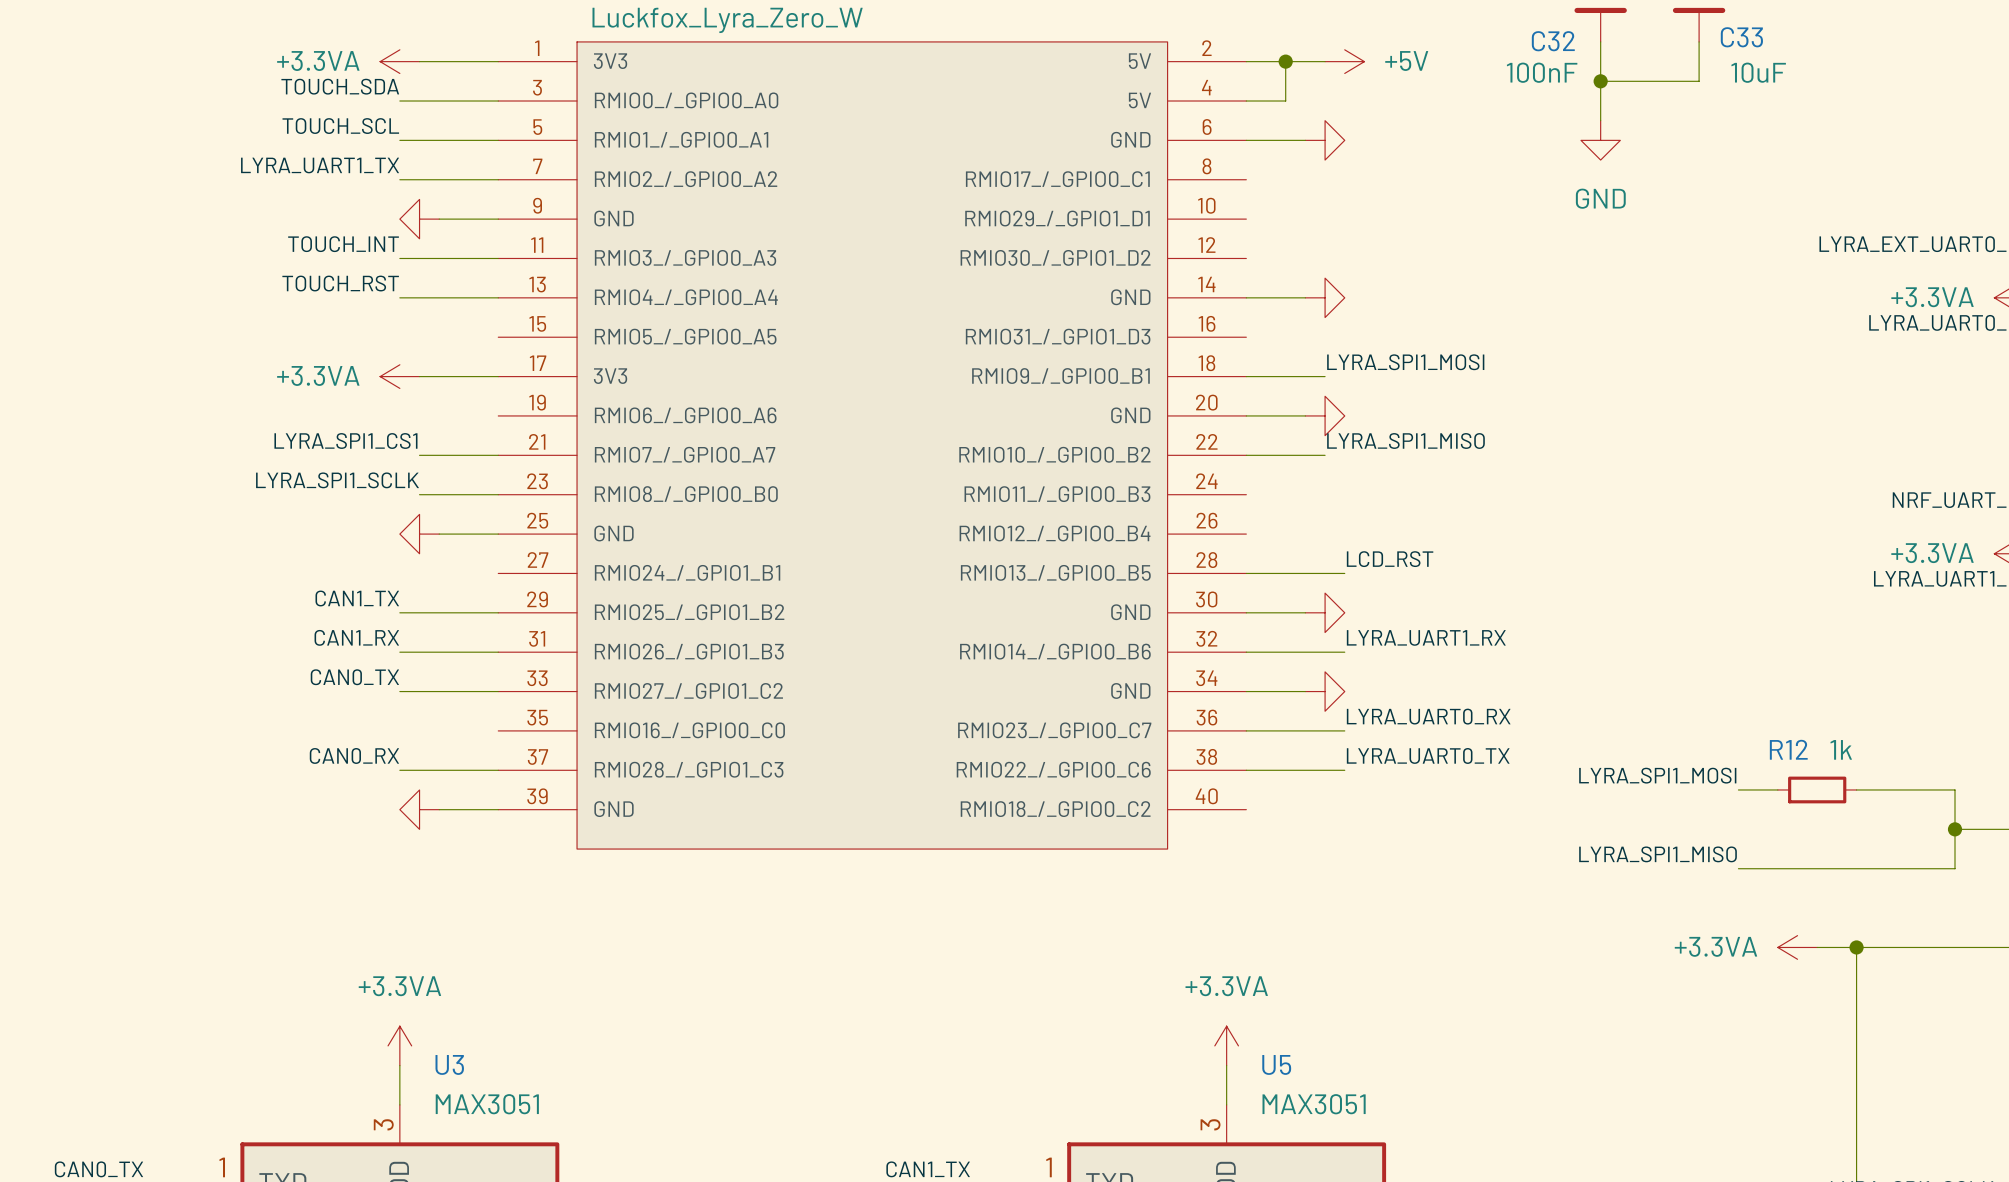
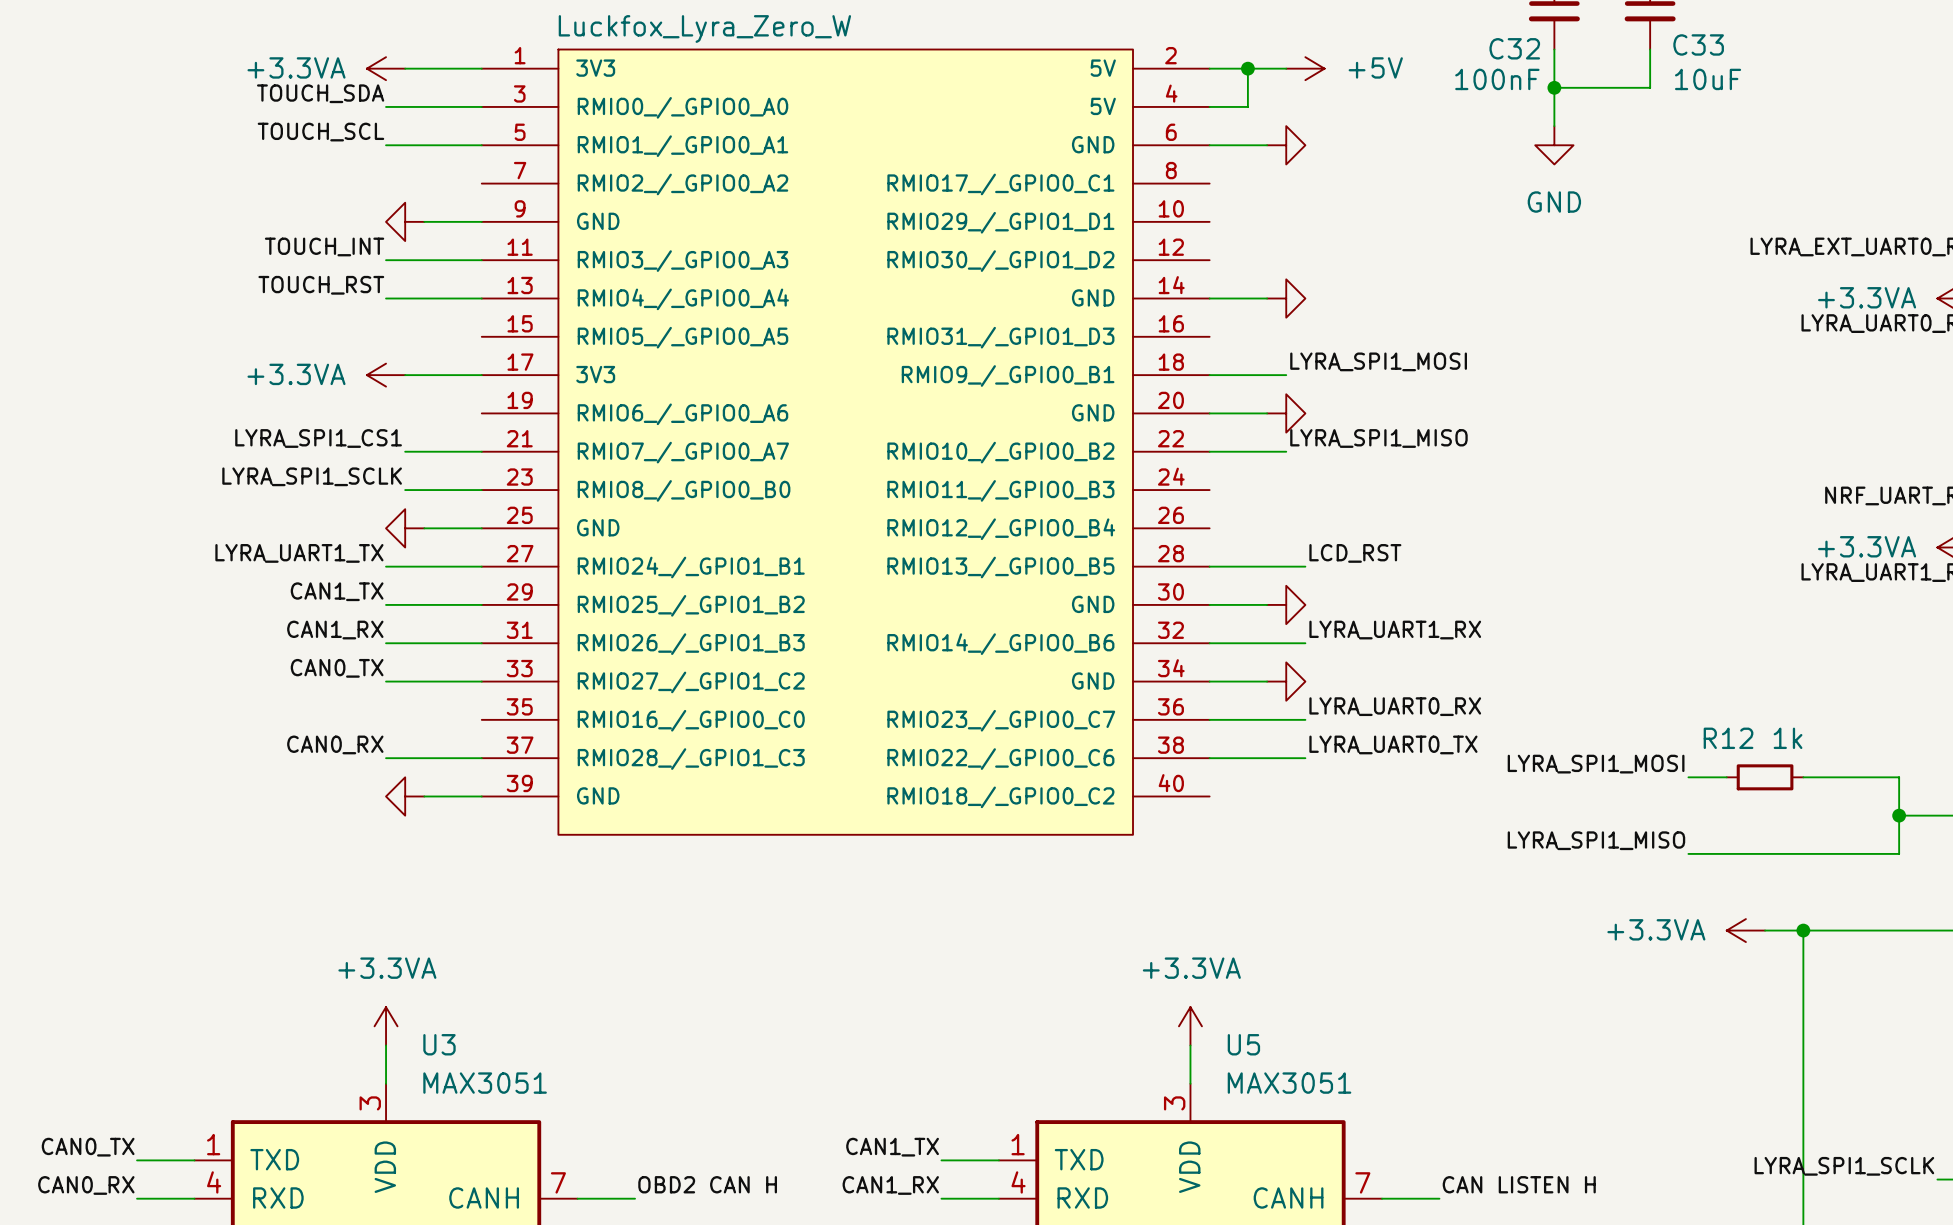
label: LYRA_UART1_TX (320, 165) -> none
wire: (399, 179) (498, 179) -> none
label: none -> LYRA_UART1_TX (299, 553)
wire: none -> (386, 566) (481, 566)

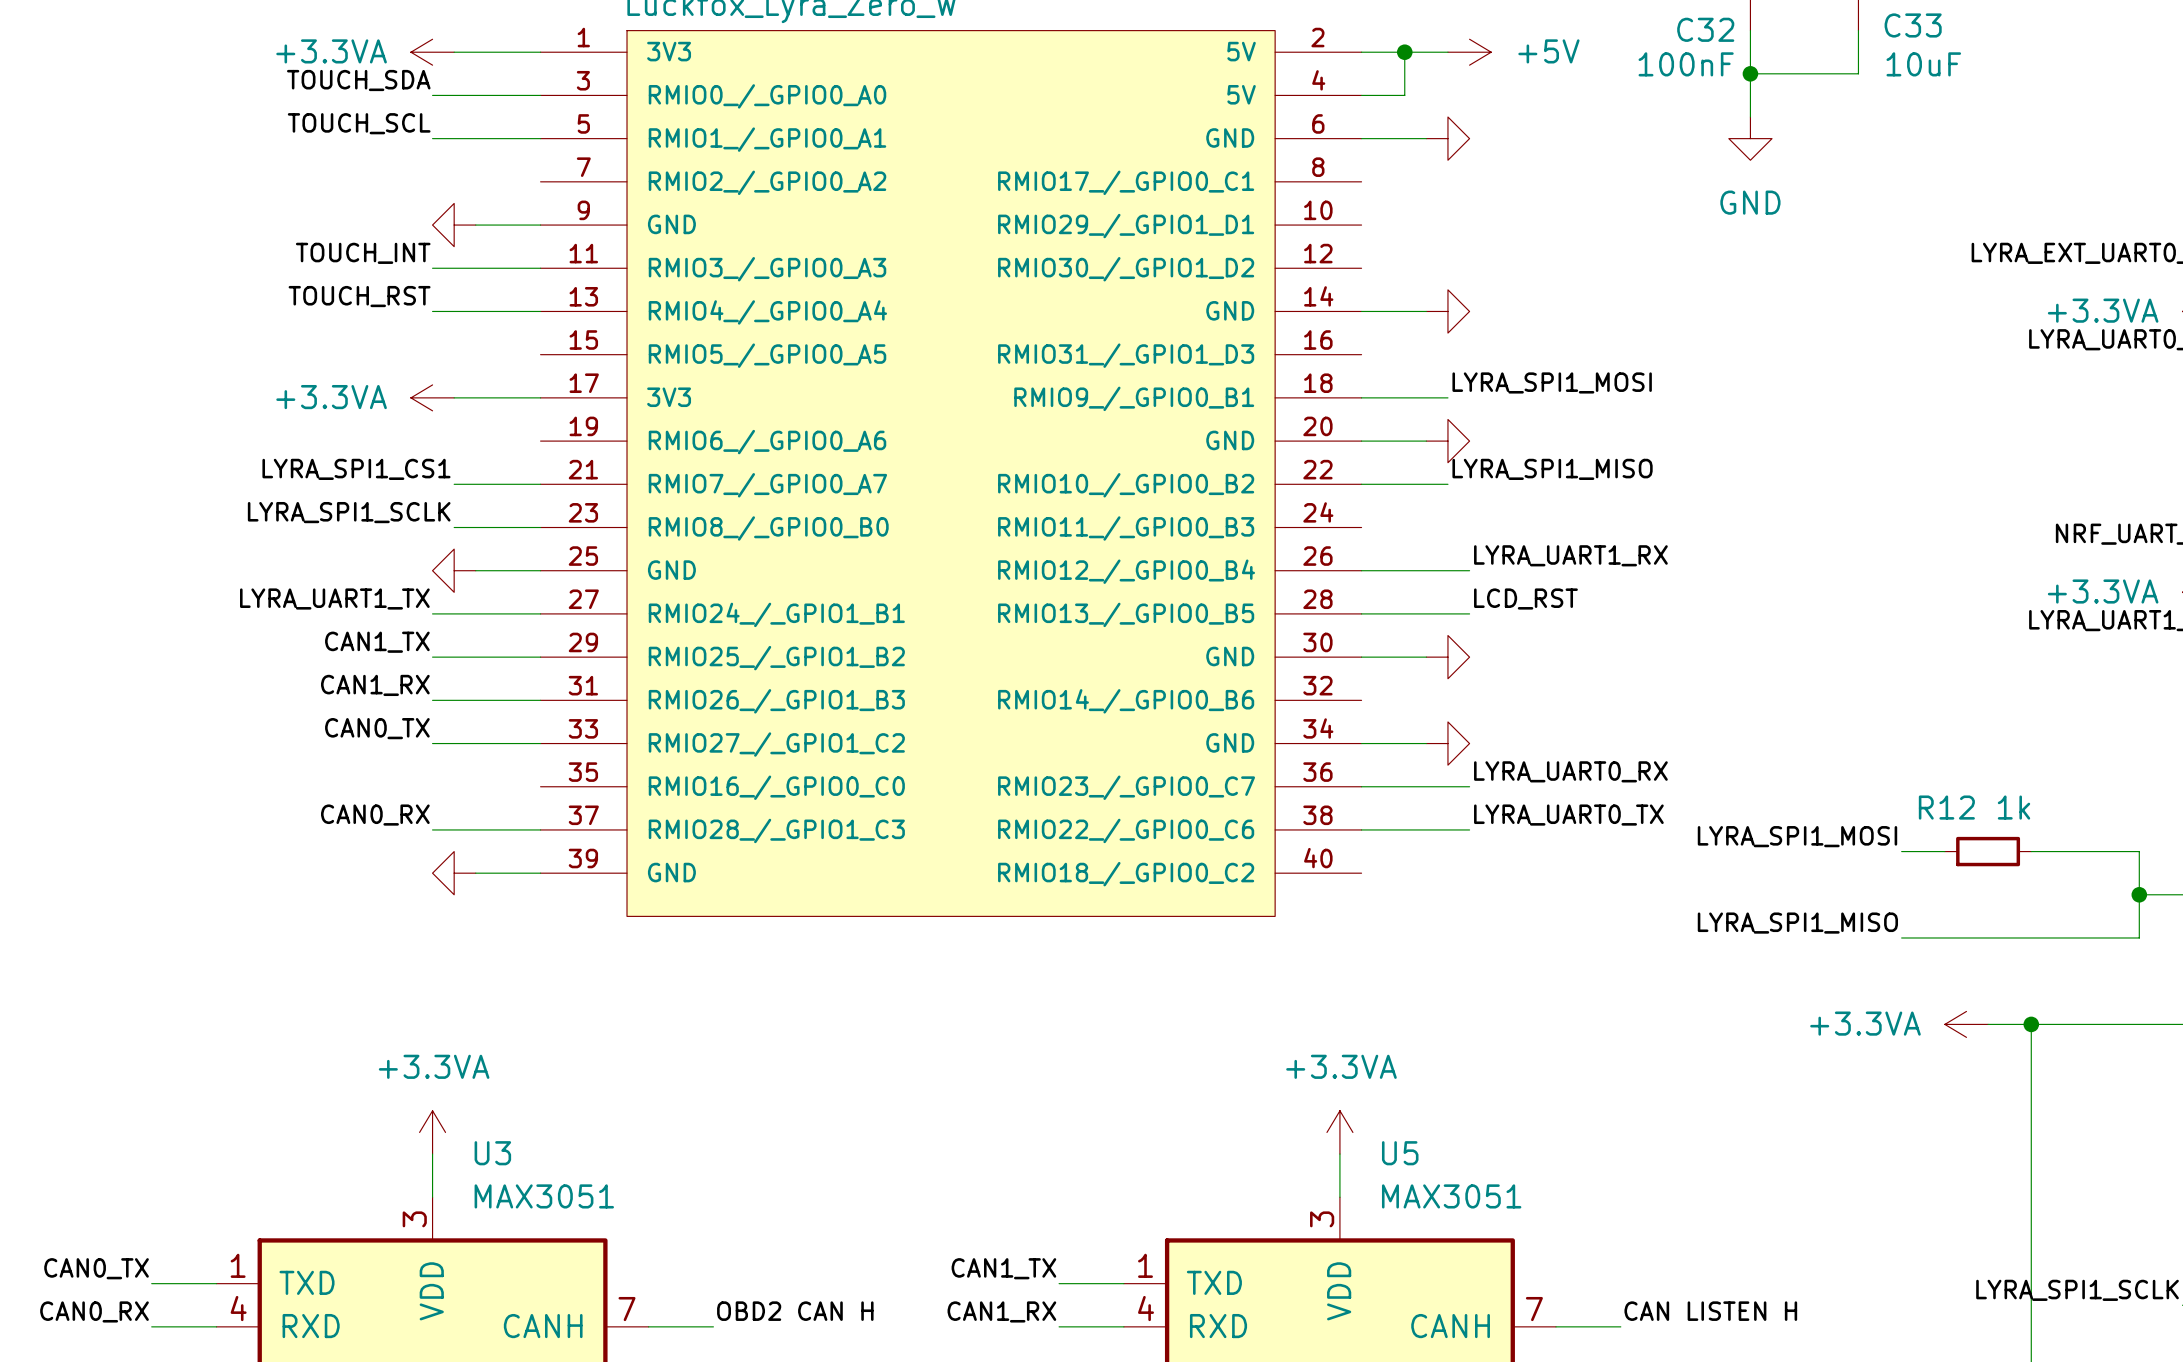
label position: LYRA_UART1_RX (1395, 630) -> LYRA_UART1_RX (1570, 555)
wire: (1209, 643) (1305, 643) -> (1361, 570) (1469, 570)

